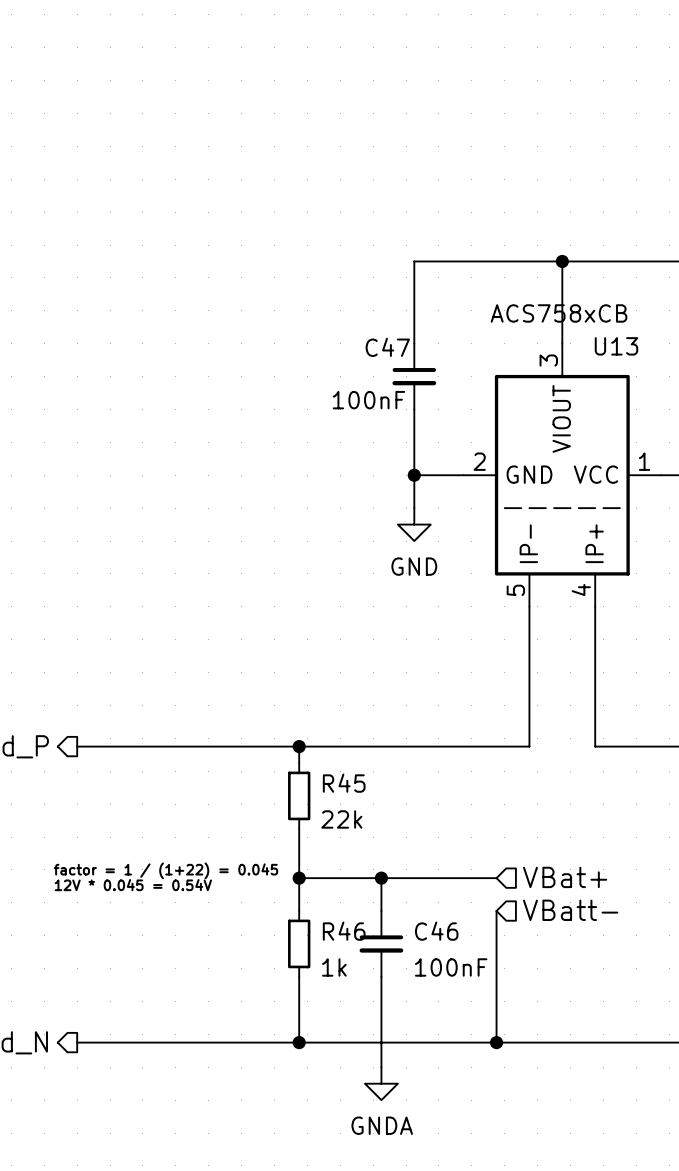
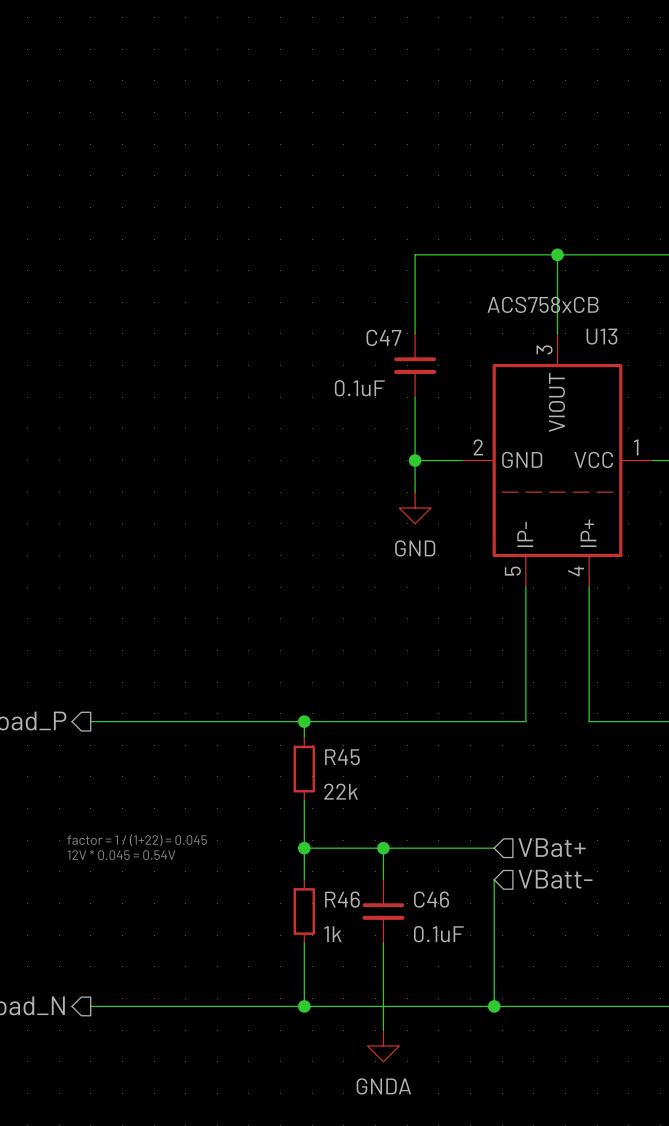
C47 value: 100nF (368, 400) -> 0.1uF (359, 388)
C46 value: 100nF (451, 967) -> 0.1uF (438, 934)

